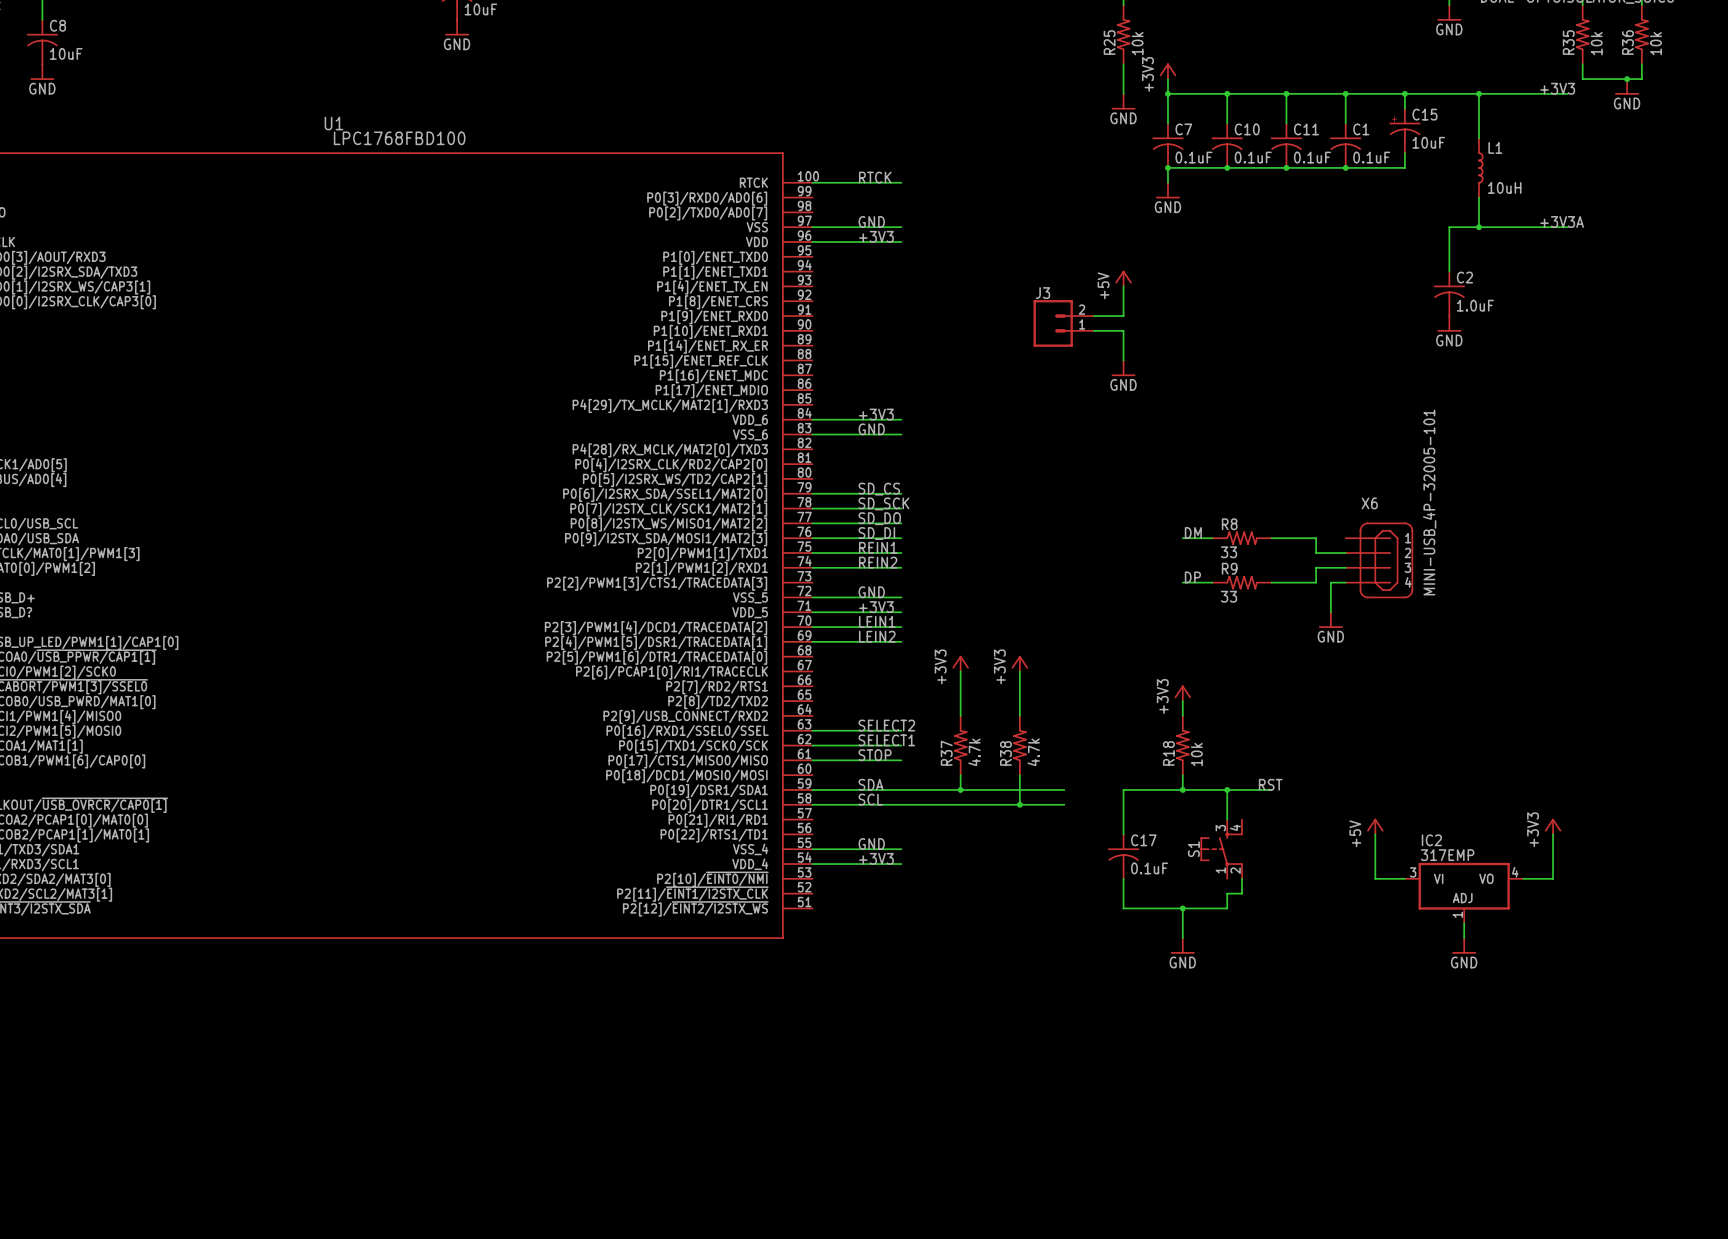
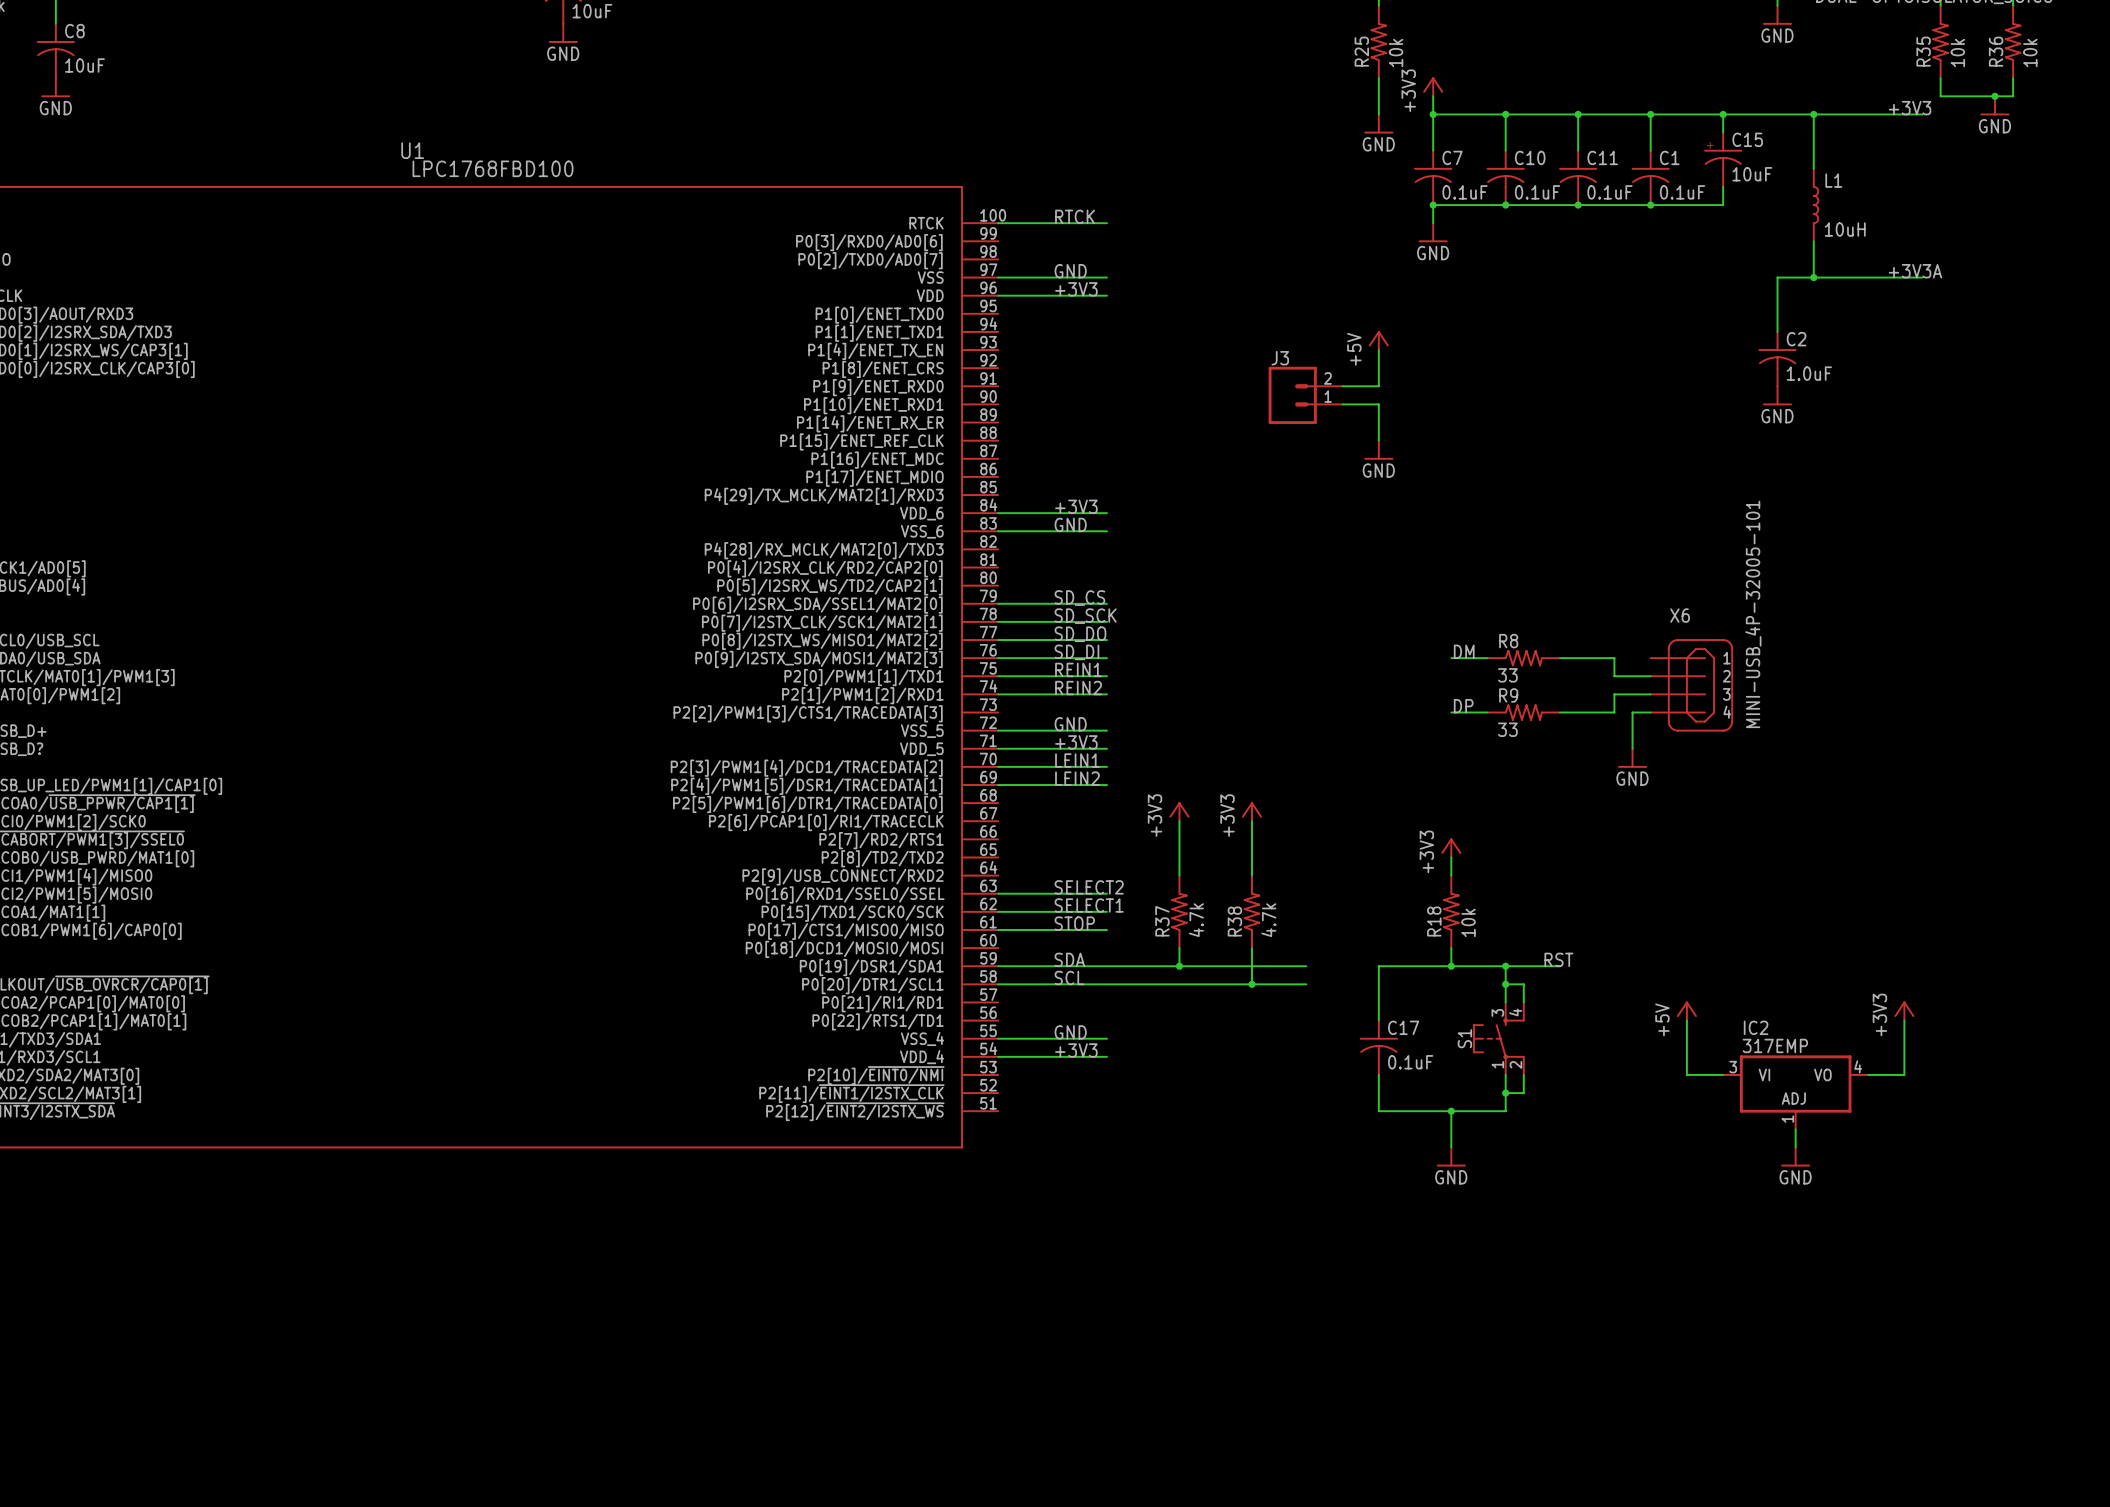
wire: none -> (1505, 984) (1523, 984) (1523, 1002)
junction: none -> (1505, 984)
wire: none -> (1505, 1074) (1505, 1093)
junction: none -> (1505, 1093)

